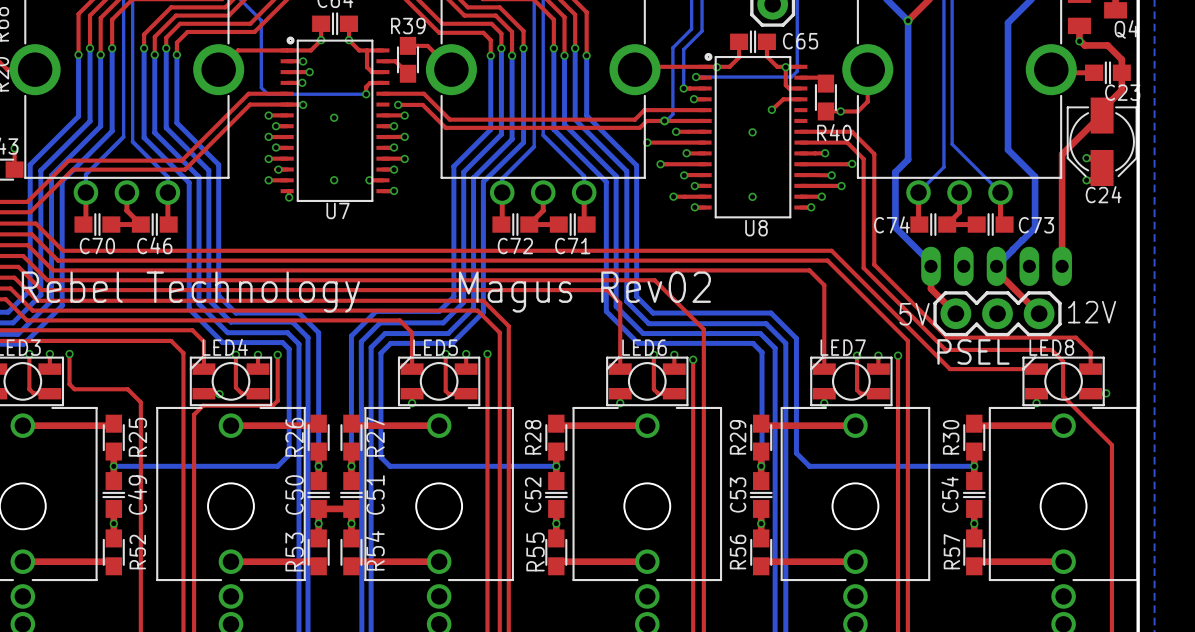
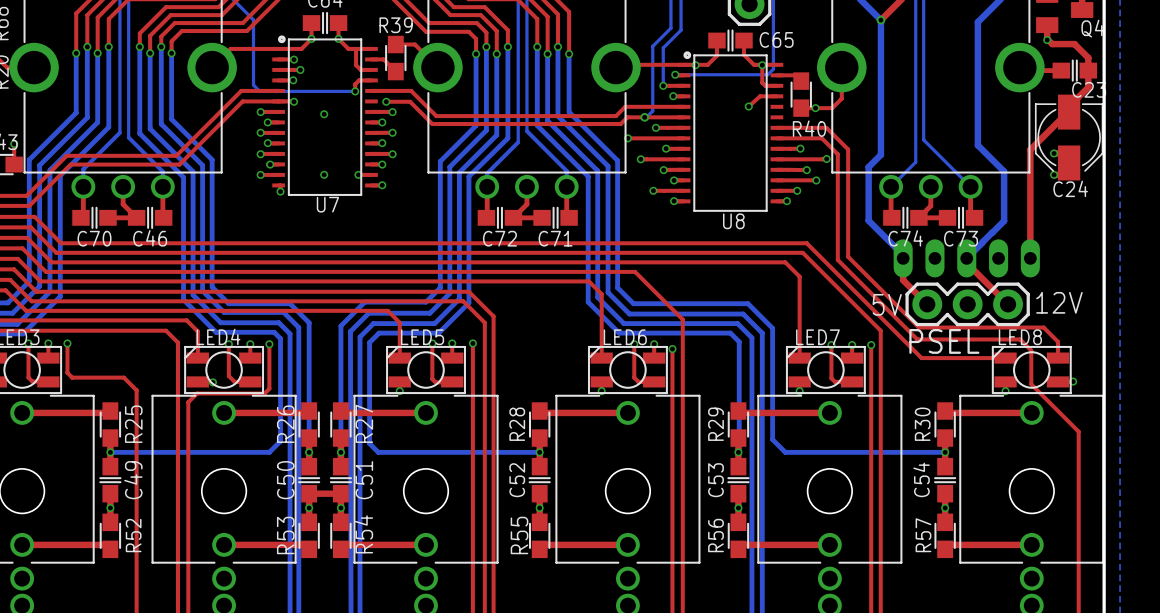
via: (752, 132) -> none
via: (752, 196) -> none
C74 name position: C74 (891, 224) -> C74 (905, 238)
C73 name position: C73 (1036, 225) -> C73 (961, 238)
text: Rebel Technology (190, 292) -> none
text: Magus Rev02 (584, 292) -> none

